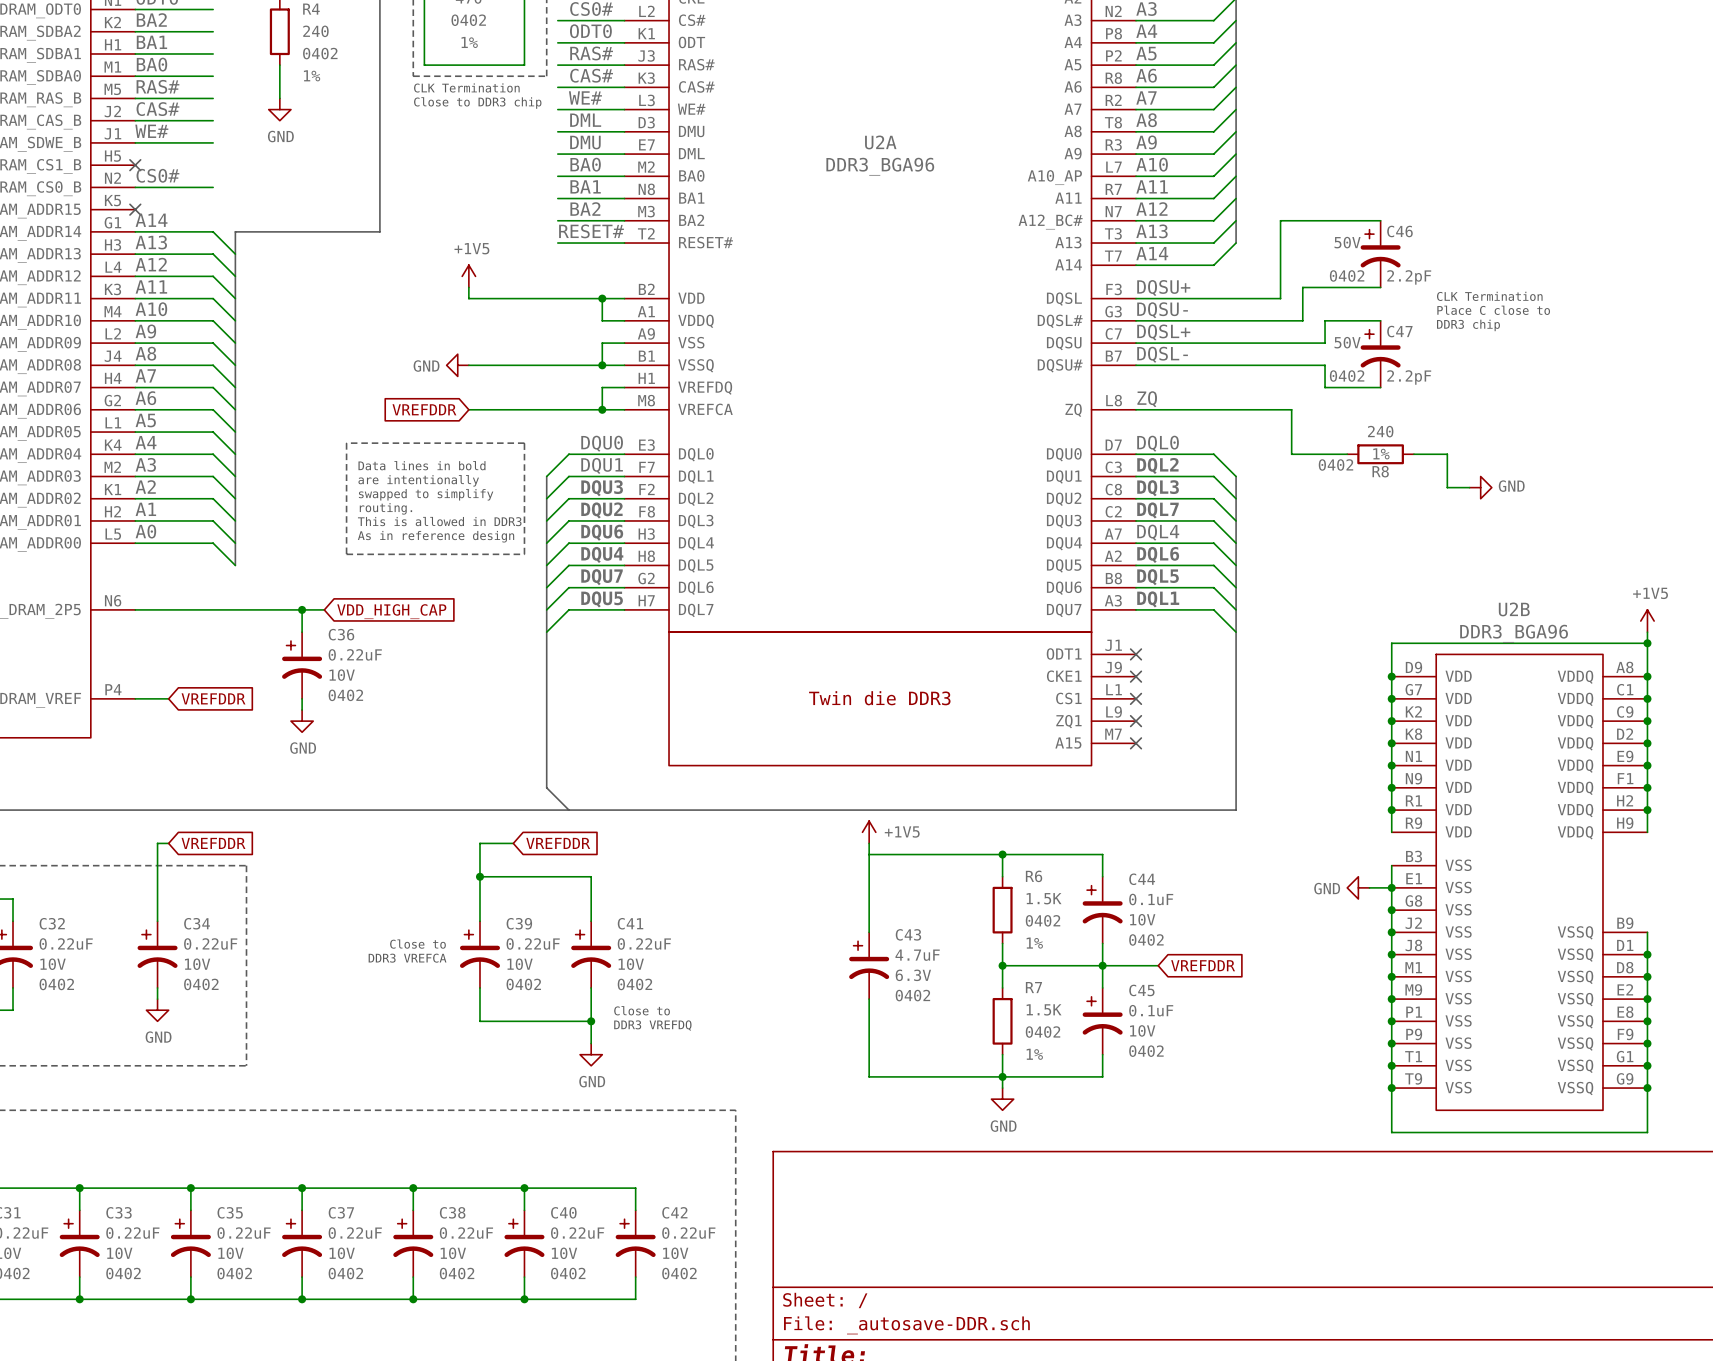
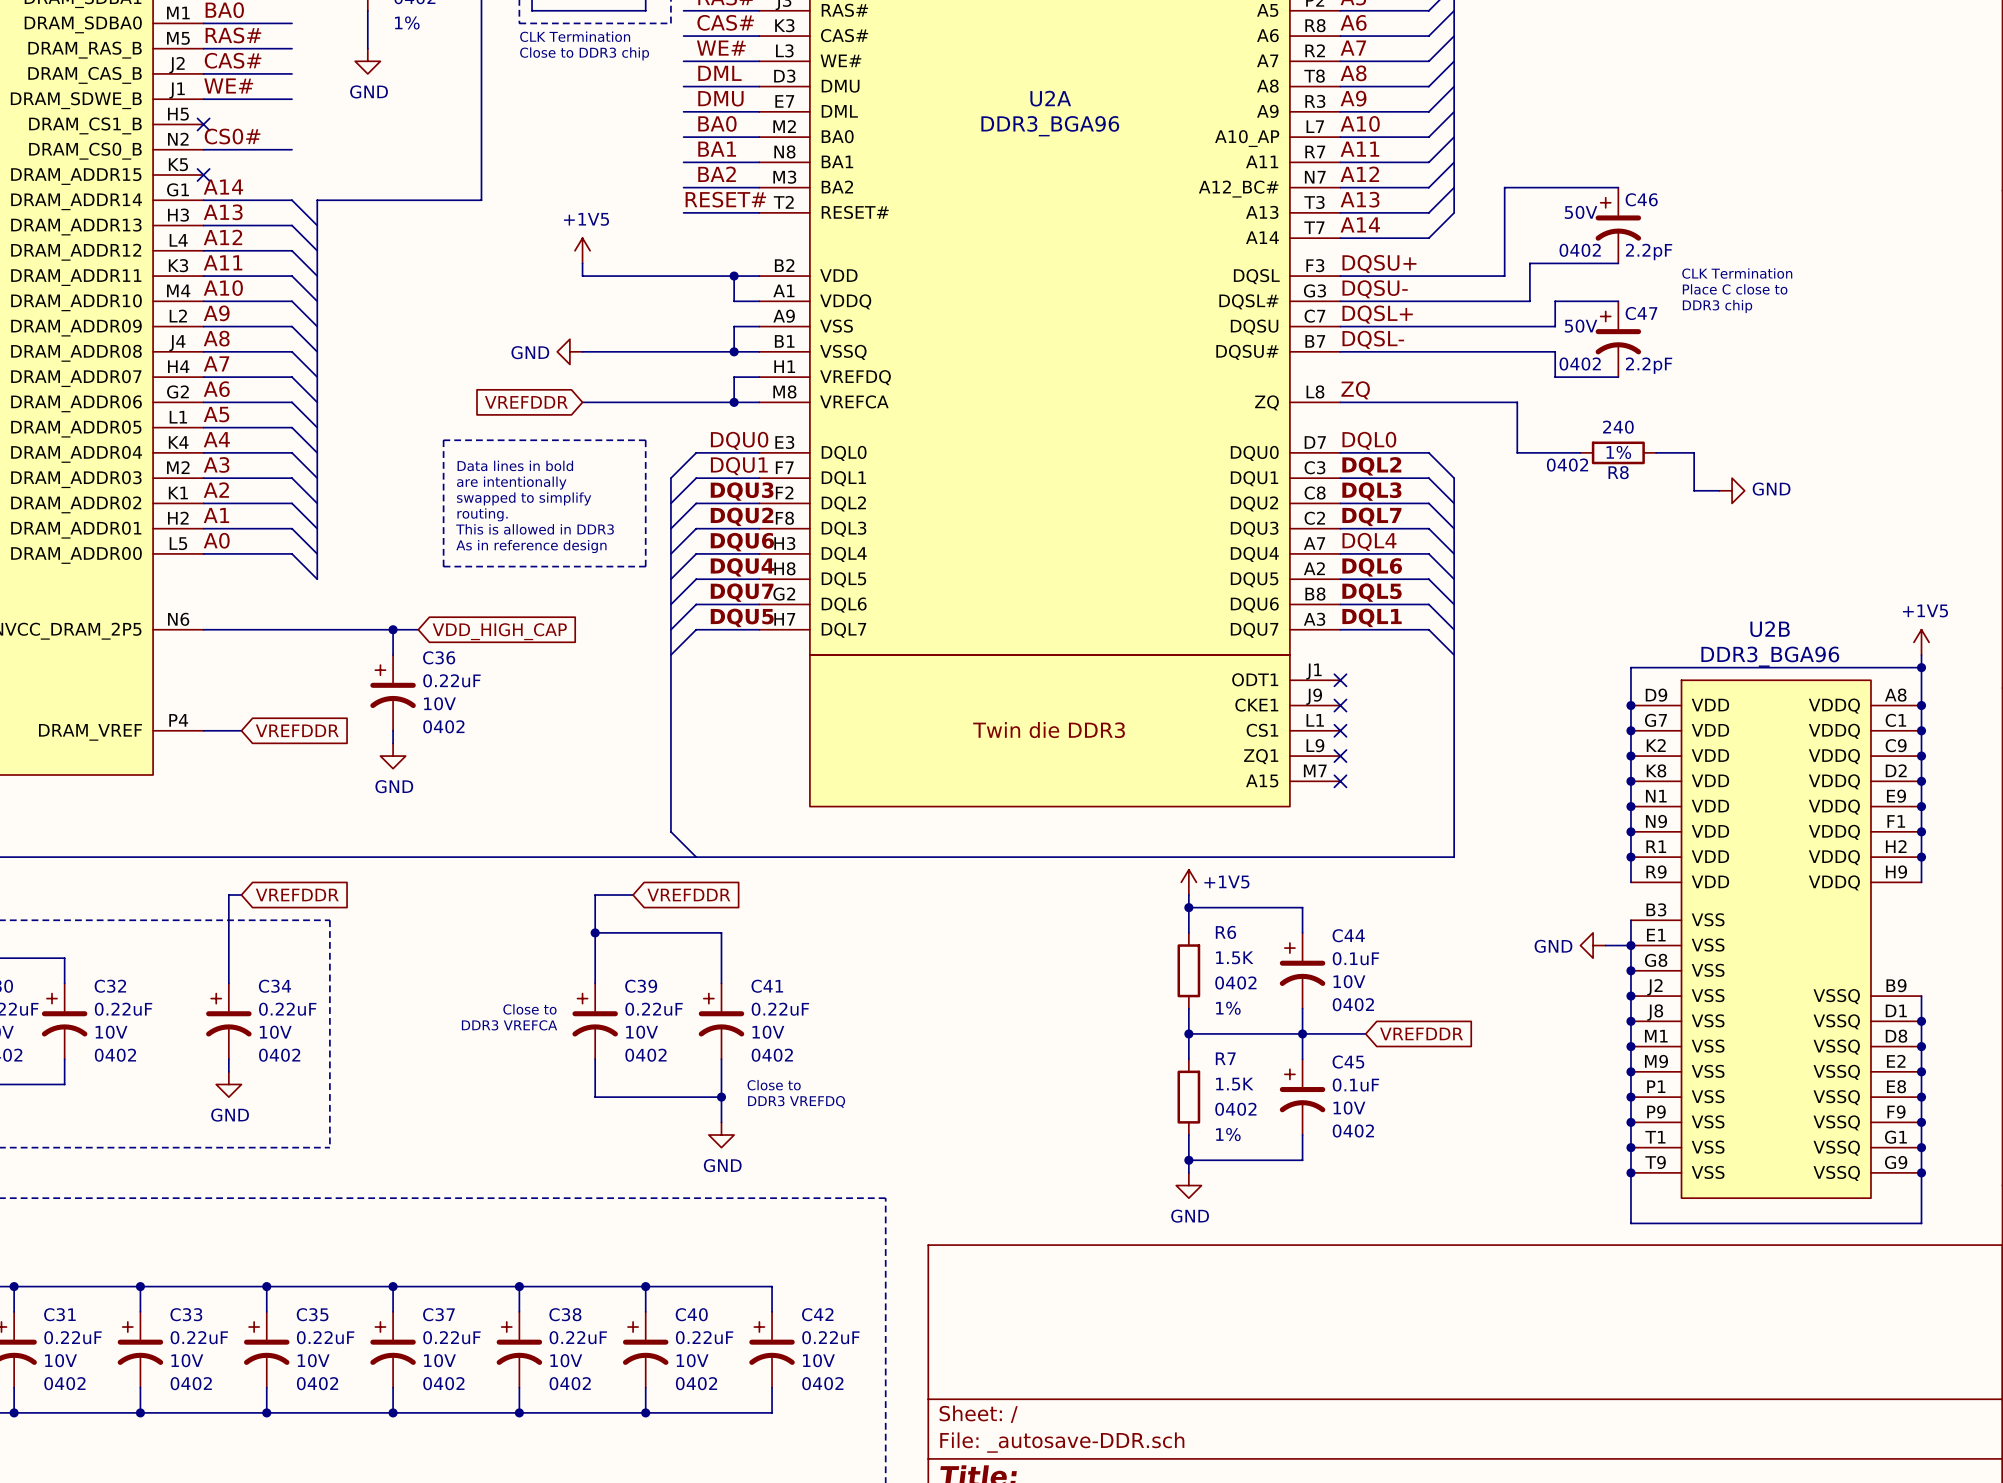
power symbol position: +1V5 (869, 832) -> +1V5 (1188, 882)
wire: (869, 843) (869, 932) -> none
wire: (869, 854) (1002, 854) -> (1188, 895) (1188, 907)
C43: 4.7uF (869, 965) -> none
wire: (869, 999) (869, 1076) (1002, 1076) -> none

